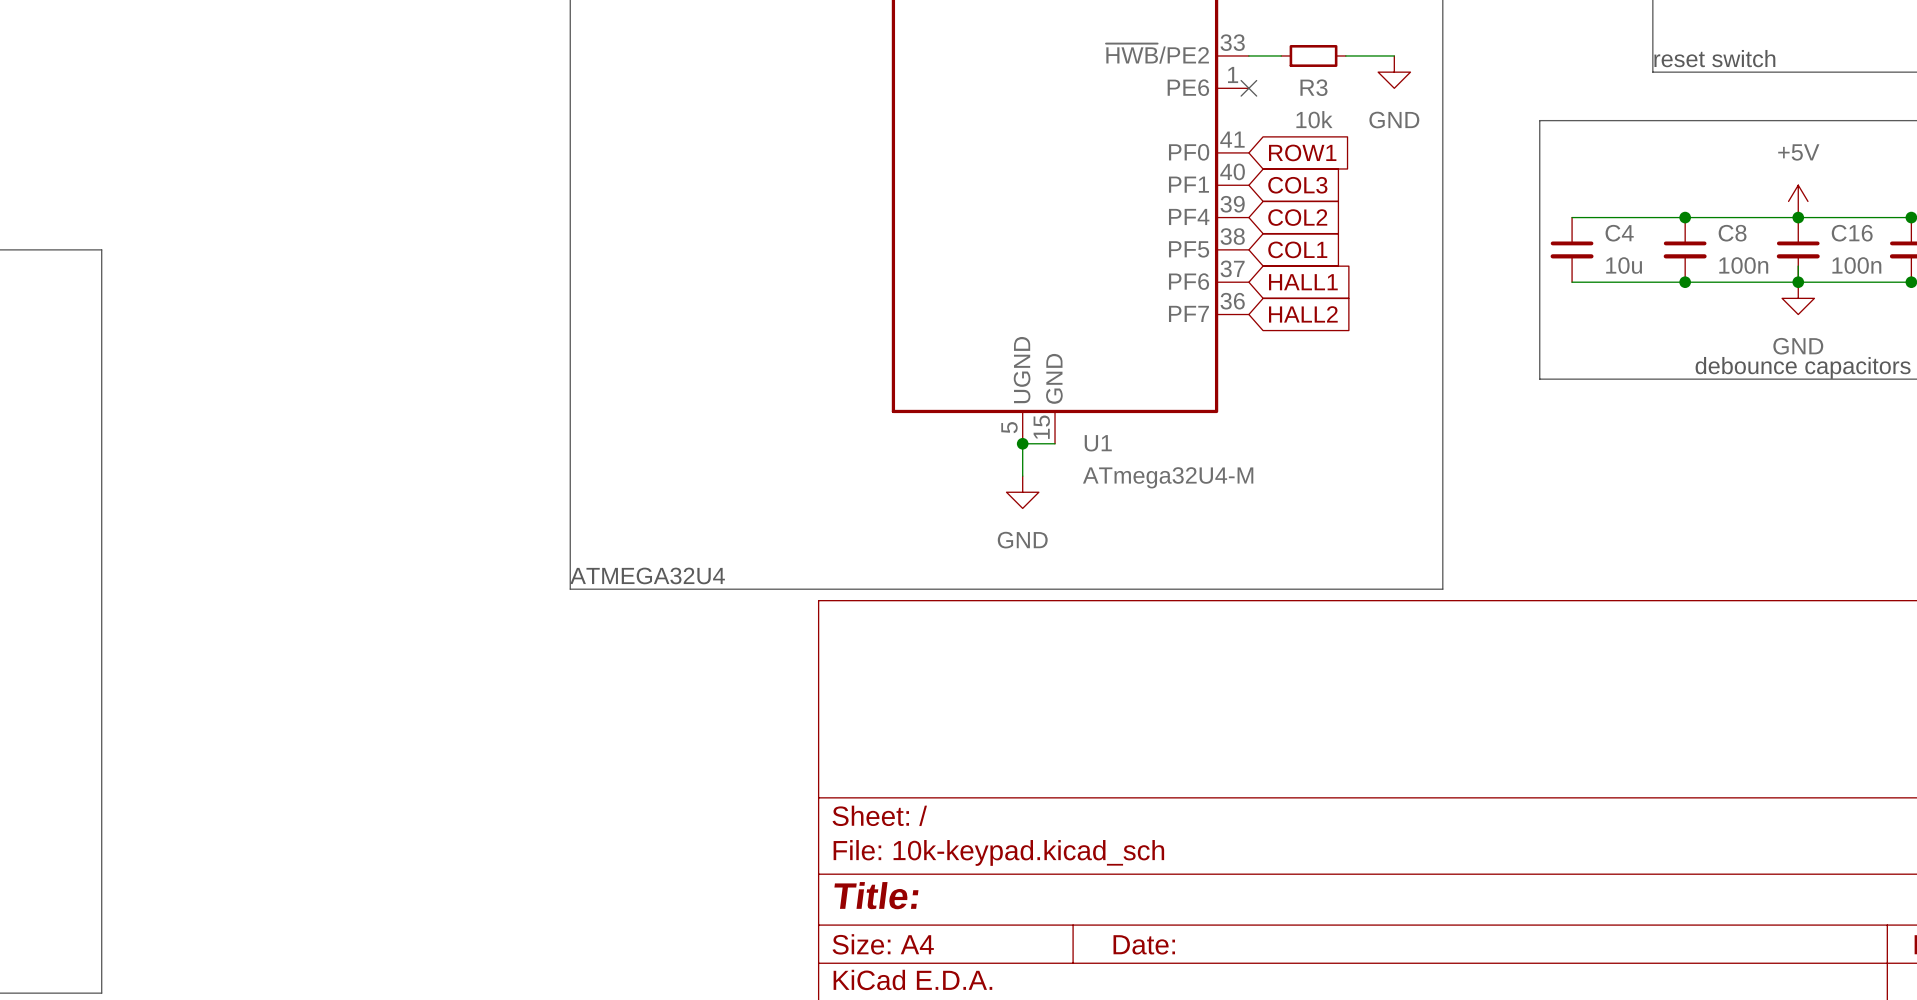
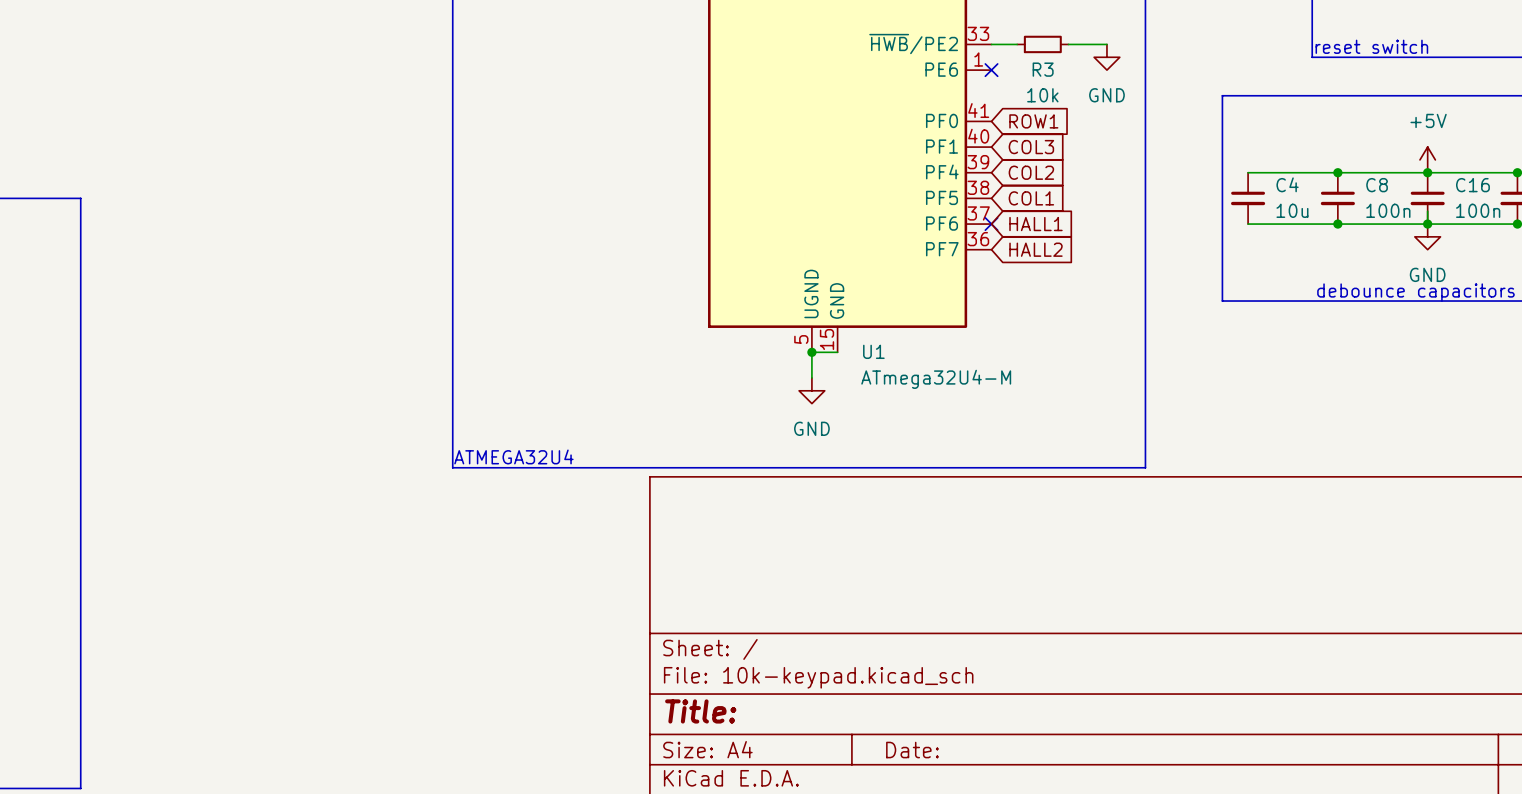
no-connect mark: none -> (991, 224)

